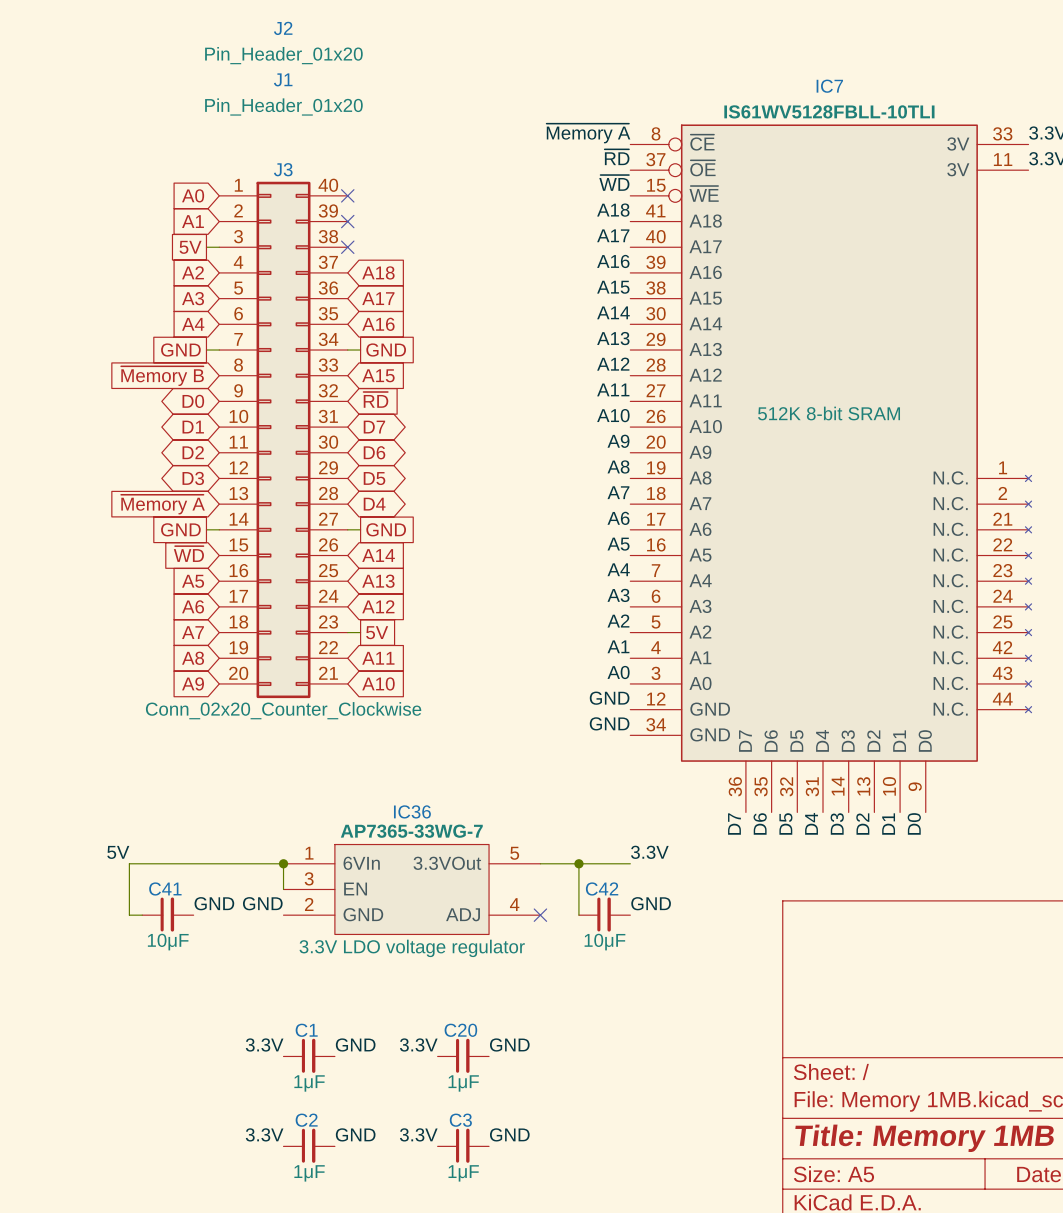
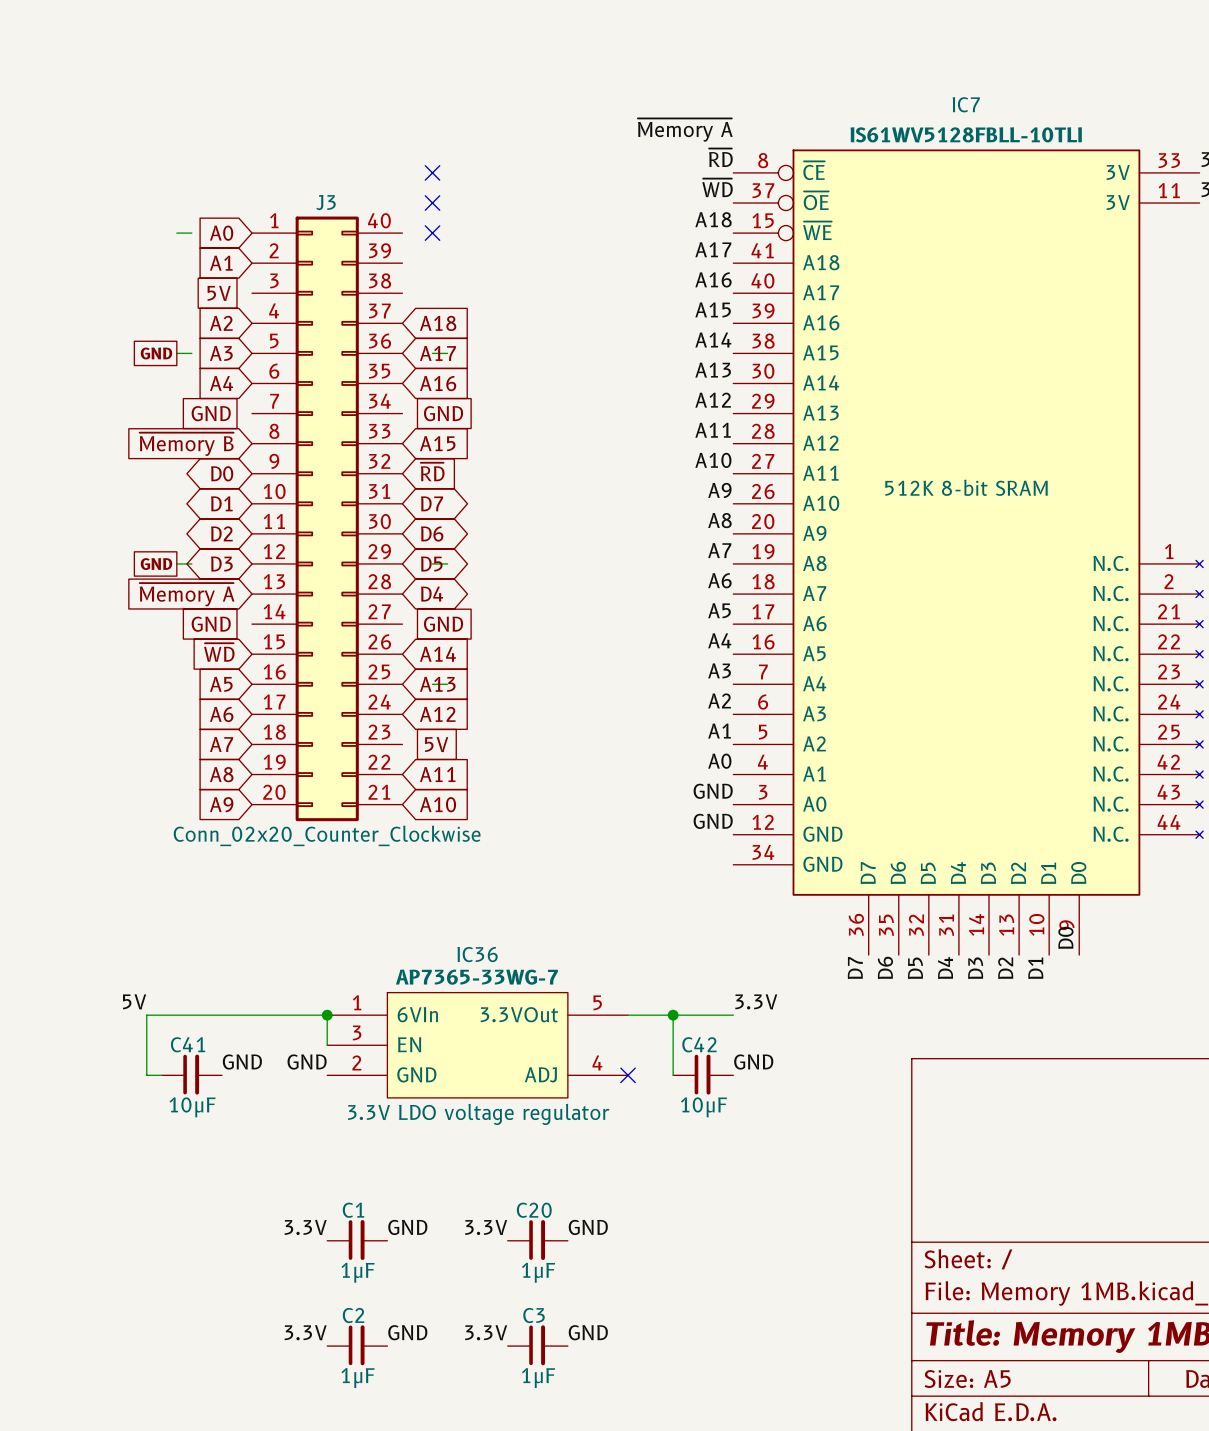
J2: Pin_Header_01x20 (283, 43) -> none
J1: Pin_Header_01x20 (283, 94) -> none
label: none -> ~{Memory A} (685, 130)
label: ~{Memory A} (588, 133) -> ~{RD} (720, 157)
no-connect mark: none -> (432, 172)
label: ~{RD} (617, 157) -> ~{WD} (717, 187)
no-connect mark: none -> (432, 203)
label: ~{WD} (614, 182) -> A18 (713, 219)
no-connect mark: (347, 195) -> none
no-connect mark: none -> (432, 233)
label: A18 (613, 210) -> A17 (713, 249)
no-connect mark: (347, 221) -> none
label: A17 (613, 235) -> A16 (713, 279)
wire: (206, 247) (219, 247) -> (176, 233) (191, 233)
no-connect mark: (347, 247) -> none
label: A16 (613, 261) -> A15 (713, 309)
label: A15 (613, 287) -> A14 (713, 339)
global label: none -> GND (156, 353)
label: A14 (613, 312) -> A13 (713, 370)
label: A13 (613, 338) -> A12 (713, 400)
wire: (206, 350) (219, 350) -> (176, 353) (191, 353)
wire: (347, 350) (360, 350) -> (432, 353) (447, 353)
label: A12 (613, 364) -> A11 (713, 430)
label: A11 (613, 389) -> A10 (713, 460)
label: A10 (613, 415) -> A9 (719, 490)
label: A9 (618, 441) -> A8 (719, 520)
label: A8 (618, 466) -> A7 (719, 550)
global label: none -> GND (156, 564)
label: A7 (618, 492) -> A6 (719, 580)
label: A6 (618, 518) -> A5 (719, 610)
wire: (206, 529) (219, 529) -> (176, 563) (191, 563)
wire: (347, 529) (360, 529) -> (432, 563) (447, 563)
label: A5 (618, 544) -> A4 (719, 640)
label: A4 (618, 569) -> A3 (719, 670)
label: A3 (618, 595) -> A2 (719, 700)
label: A2 (618, 621) -> A1 (719, 731)
wire: (347, 632) (360, 632) -> (432, 684) (447, 684)
label: A1 (618, 646) -> A0 (719, 761)
label: A0 (618, 672) -> GND (713, 791)
label: GND (609, 723) -> none
label position: D0 (914, 823) -> D0 (1065, 937)

